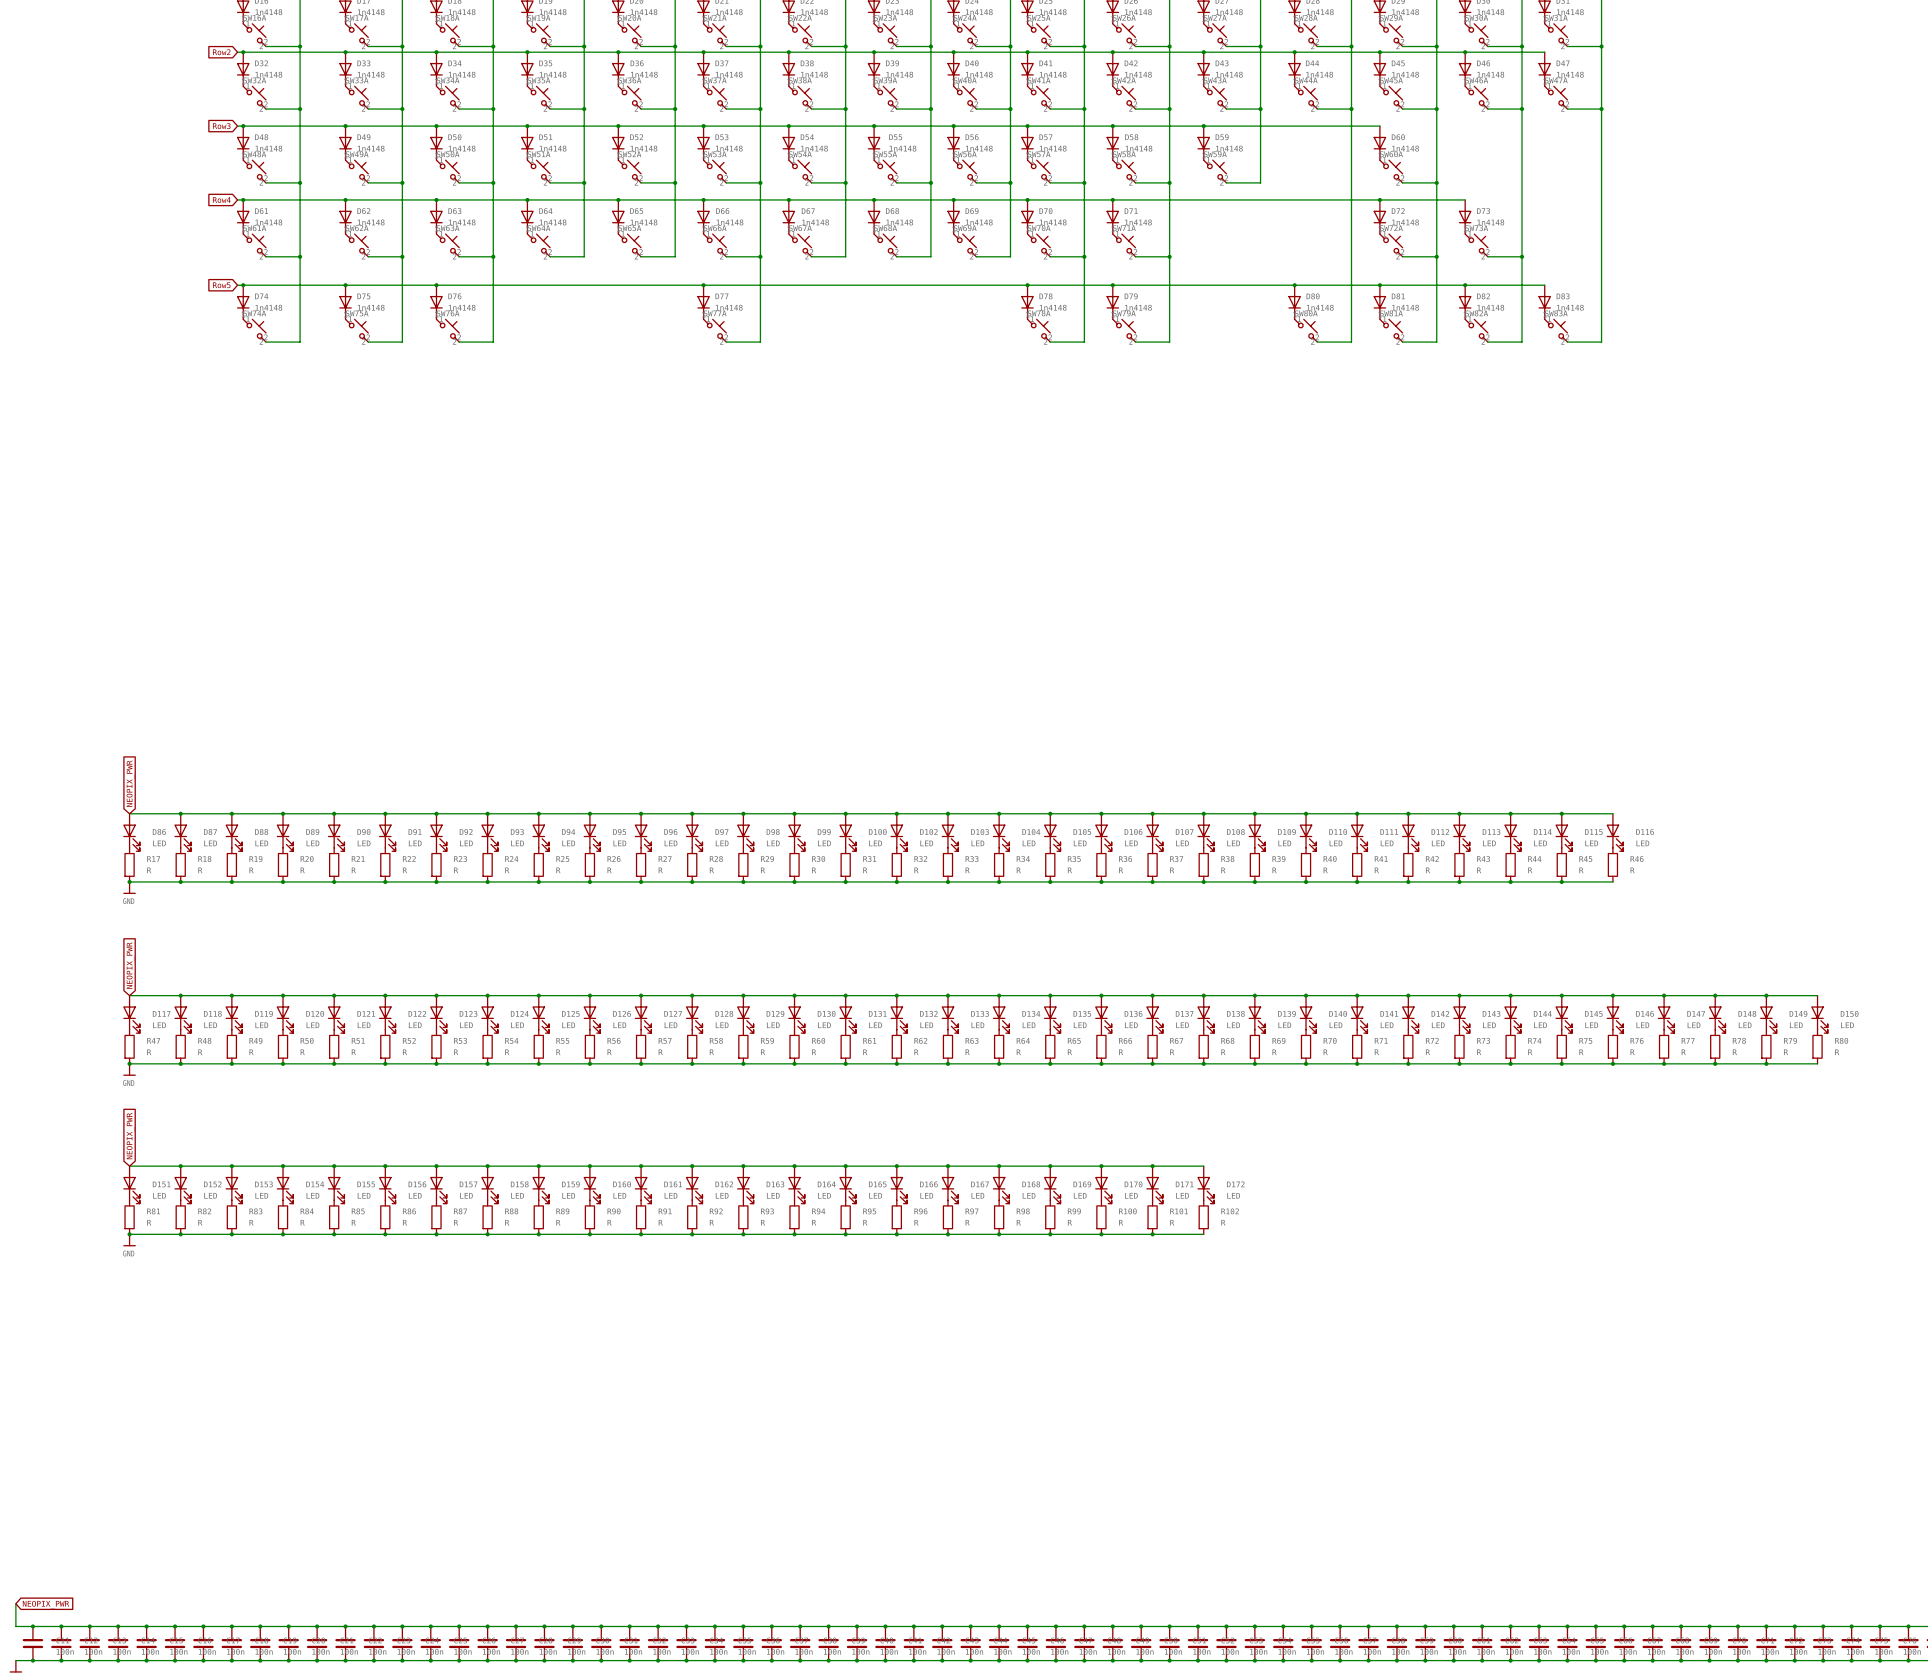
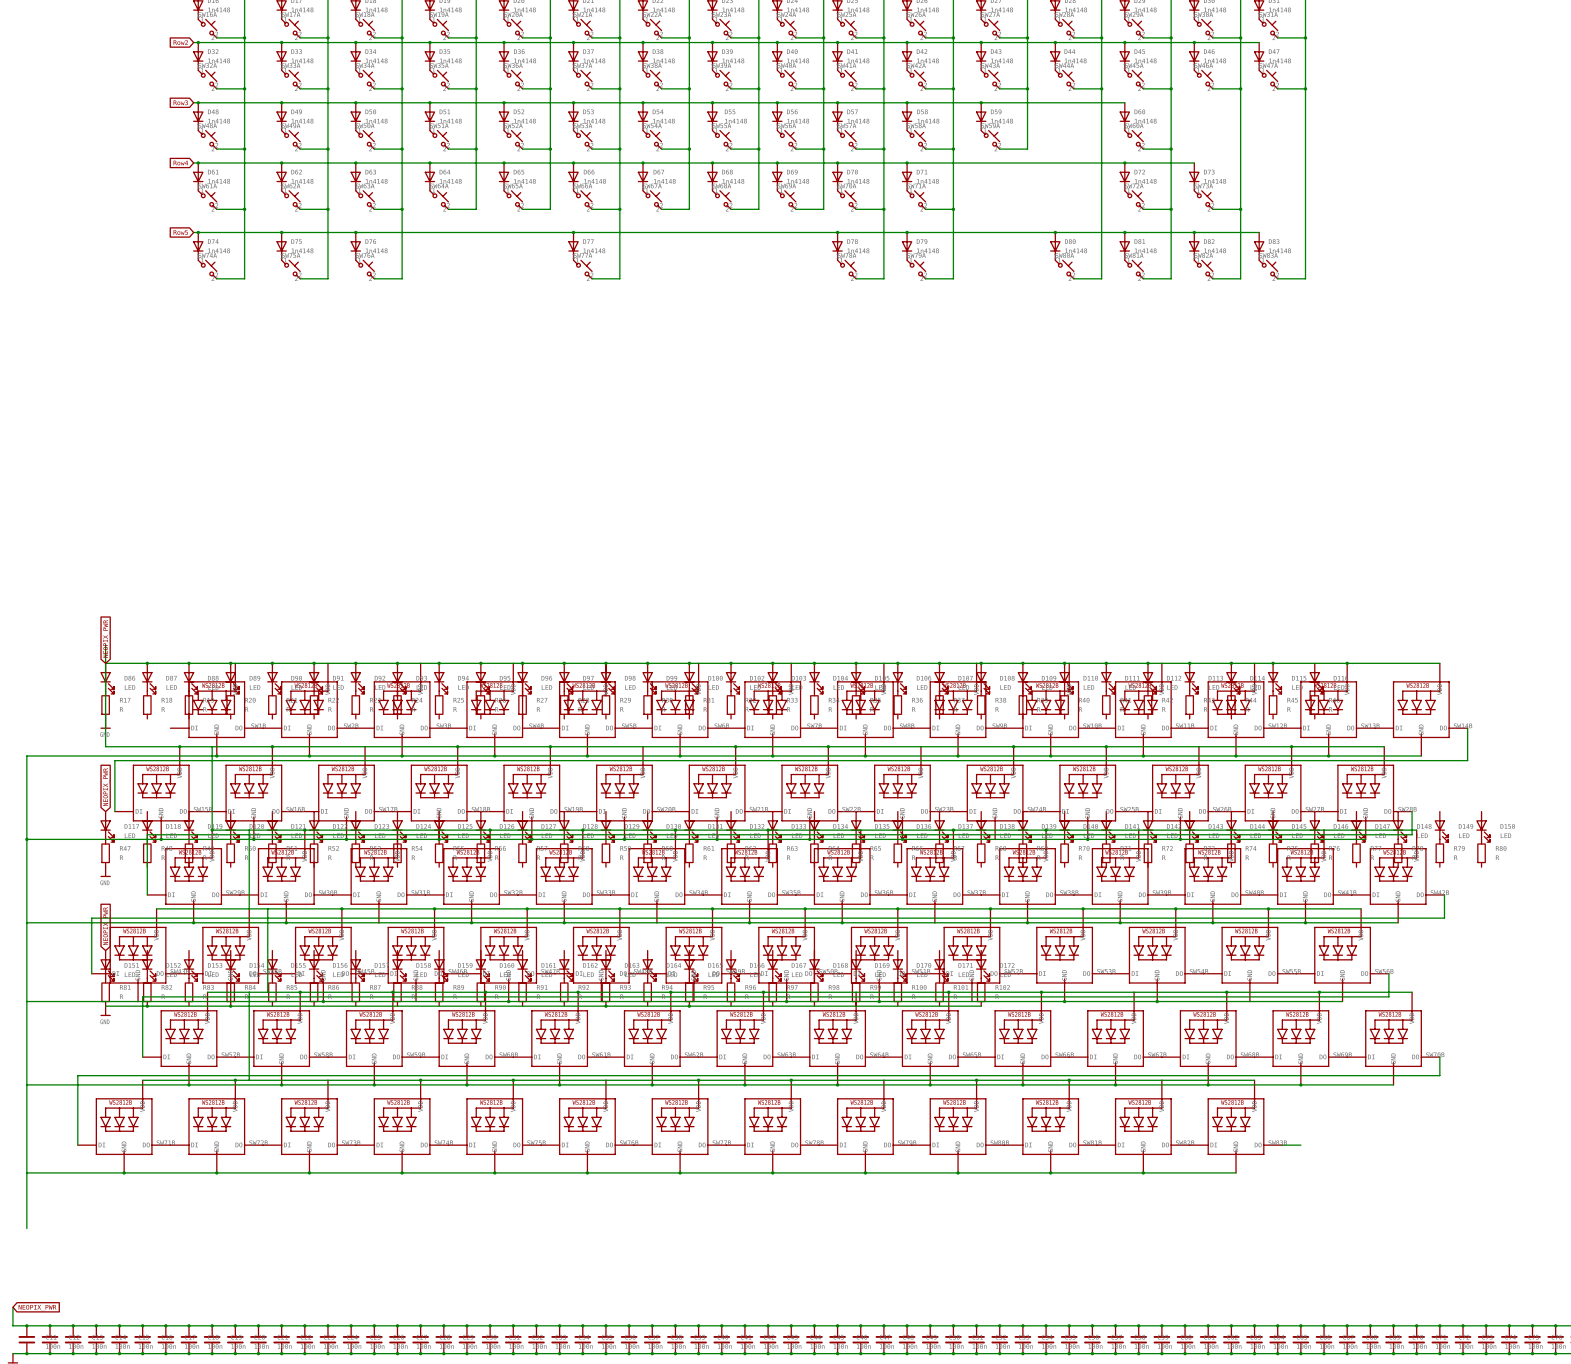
wire: none -> (105, 644) (105, 746) (1384, 746)
wire: none -> (1314, 663) (1439, 663)
junction: none -> (1347, 663)
part: none -> (216, 709)
part: none -> (309, 709)
part: none -> (402, 709)
part: none -> (494, 709)
part: none -> (587, 709)
part: none -> (680, 709)
part: none -> (772, 709)
part: none -> (865, 709)
part: none -> (958, 709)
part: none -> (1050, 709)
part: none -> (1143, 709)
part: none -> (1236, 709)
part: none -> (1328, 709)
part: none -> (1421, 709)
wire: (129, 881) (1612, 881) -> none
junction: (129, 881) -> none
junction: (180, 881) -> none
junction: (231, 881) -> none
junction: (283, 881) -> none
junction: (334, 881) -> none
junction: (385, 881) -> none
junction: (436, 881) -> none
junction: (487, 881) -> none
junction: (538, 881) -> none
junction: (589, 881) -> none
junction: (641, 881) -> none
junction: (692, 881) -> none
junction: (743, 881) -> none
junction: (794, 881) -> none
junction: (845, 881) -> none
junction: (896, 881) -> none
junction: (947, 881) -> none
junction: (999, 881) -> none
junction: (1050, 881) -> none
junction: (1101, 881) -> none
junction: (1152, 881) -> none
junction: (1203, 881) -> none
junction: (1254, 881) -> none
junction: (1306, 881) -> none
junction: (1357, 881) -> none
junction: (1408, 881) -> none
junction: (1459, 881) -> none
junction: (1510, 881) -> none
junction: (1561, 881) -> none
wire: none -> (1467, 728) (1467, 760) (114, 760) (114, 811)
junction: none -> (179, 746)
wire: none -> (212, 746) (212, 830) (1416, 830)
junction: none -> (272, 746)
junction: none -> (457, 746)
junction: none -> (550, 746)
junction: none -> (735, 746)
junction: none -> (828, 746)
junction: none -> (1013, 746)
junction: none -> (1106, 746)
junction: none -> (1291, 746)
junction: none -> (216, 755)
junction: none -> (309, 755)
junction: none -> (402, 755)
junction: none -> (494, 755)
junction: none -> (587, 755)
junction: none -> (680, 755)
junction: none -> (772, 755)
junction: none -> (865, 755)
junction: none -> (958, 755)
junction: none -> (1050, 755)
junction: none -> (1143, 755)
junction: none -> (1236, 755)
junction: none -> (1328, 755)
wire: none -> (1421, 755) (26, 755) (26, 1228)
part: none -> (161, 793)
part: none -> (253, 793)
part: none -> (346, 793)
part: none -> (439, 793)
part: none -> (531, 793)
part: none -> (624, 793)
part: none -> (717, 793)
part: none -> (809, 793)
part: none -> (902, 793)
part: none -> (995, 793)
part: none -> (1087, 793)
part: none -> (1180, 793)
part: none -> (1273, 793)
part: none -> (1365, 793)
wire: (129, 995) (1817, 995) -> none
junction: (180, 995) -> none
junction: (231, 995) -> none
junction: (283, 995) -> none
junction: (334, 995) -> none
junction: (385, 995) -> none
junction: (436, 995) -> none
junction: (487, 995) -> none
junction: (538, 995) -> none
junction: (589, 995) -> none
junction: (641, 995) -> none
junction: (692, 995) -> none
junction: (743, 995) -> none
junction: (794, 995) -> none
junction: (845, 995) -> none
junction: (896, 995) -> none
junction: (947, 995) -> none
junction: (999, 995) -> none
junction: (1050, 995) -> none
junction: (1101, 995) -> none
junction: (1152, 995) -> none
junction: (1203, 995) -> none
junction: (1254, 995) -> none
junction: (1306, 995) -> none
junction: (1357, 995) -> none
junction: (1408, 995) -> none
junction: (1459, 995) -> none
junction: (1510, 995) -> none
junction: (1561, 995) -> none
junction: (1612, 995) -> none
junction: (1664, 995) -> none
junction: (1715, 995) -> none
wire: none -> (1412, 811) (1412, 834) (147, 834) (147, 894)
junction: (1766, 995) -> none
junction: none -> (212, 830)
wire: none -> (249, 830) (249, 908)
junction: none -> (304, 830)
junction: none -> (490, 830)
junction: none -> (582, 830)
junction: none -> (675, 830)
junction: none -> (768, 830)
junction: none -> (953, 830)
junction: none -> (1046, 830)
wire: none -> (26, 839) (1365, 839)
junction: none -> (26, 839)
junction: none -> (161, 839)
junction: none -> (253, 839)
junction: none -> (346, 839)
junction: none -> (439, 839)
junction: none -> (531, 839)
junction: none -> (624, 839)
junction: none -> (717, 839)
junction: none -> (809, 839)
junction: none -> (902, 839)
junction: none -> (1087, 839)
junction: none -> (1180, 839)
wire: (129, 1063) (1817, 1063) -> none
junction: (129, 1063) -> none
junction: (180, 1063) -> none
junction: (231, 1063) -> none
junction: (283, 1063) -> none
junction: (334, 1063) -> none
junction: (385, 1063) -> none
junction: (436, 1063) -> none
junction: (487, 1063) -> none
junction: (538, 1063) -> none
junction: (589, 1063) -> none
junction: (641, 1063) -> none
junction: (692, 1063) -> none
junction: (743, 1063) -> none
junction: (794, 1063) -> none
junction: (845, 1063) -> none
junction: (896, 1063) -> none
junction: (947, 1063) -> none
junction: (999, 1063) -> none
junction: (1050, 1063) -> none
junction: (1101, 1063) -> none
junction: (1152, 1063) -> none
junction: (1203, 1063) -> none
junction: (1254, 1063) -> none
junction: (1306, 1063) -> none
junction: (1357, 1063) -> none
junction: (1408, 1063) -> none
junction: (1459, 1063) -> none
junction: (1510, 1063) -> none
junction: (1561, 1063) -> none
junction: (1612, 1063) -> none
junction: (1664, 1063) -> none
junction: (1715, 1063) -> none
junction: (1766, 1063) -> none
part: none -> (193, 876)
part: none -> (286, 876)
part: none -> (378, 876)
part: none -> (471, 876)
part: none -> (564, 876)
part: none -> (656, 876)
part: none -> (749, 876)
part: none -> (842, 876)
part: none -> (934, 876)
part: none -> (1027, 876)
part: none -> (1120, 876)
part: none -> (1212, 876)
part: none -> (1305, 876)
part: none -> (1398, 876)
wire: none -> (1444, 894) (1444, 918) (91, 918) (91, 973)
wire: none -> (156, 908) (1361, 908)
wire: none -> (267, 908) (267, 992)
junction: none -> (341, 908)
junction: none -> (434, 908)
junction: none -> (527, 908)
junction: none -> (619, 908)
junction: none -> (712, 908)
junction: none -> (805, 908)
junction: none -> (897, 908)
junction: none -> (990, 908)
junction: none -> (1083, 908)
junction: none -> (1175, 908)
junction: none -> (1268, 908)
wire: none -> (26, 922) (1398, 922)
junction: none -> (193, 922)
junction: none -> (286, 922)
junction: none -> (471, 922)
junction: none -> (564, 922)
junction: none -> (749, 922)
junction: none -> (842, 922)
junction: none -> (1027, 922)
junction: none -> (1120, 922)
junction: none -> (1212, 922)
junction: none -> (1305, 922)
wire: (129, 1166) (1203, 1166) -> none
junction: (180, 1166) -> none
junction: (231, 1166) -> none
junction: (283, 1166) -> none
junction: (334, 1166) -> none
junction: (385, 1166) -> none
junction: (436, 1166) -> none
junction: (487, 1166) -> none
junction: (538, 1166) -> none
junction: (589, 1166) -> none
junction: (641, 1166) -> none
junction: (692, 1166) -> none
junction: (743, 1166) -> none
junction: (794, 1166) -> none
junction: (845, 1166) -> none
junction: (896, 1166) -> none
junction: (947, 1166) -> none
junction: (999, 1166) -> none
junction: (1050, 1166) -> none
junction: (1101, 1166) -> none
junction: (1152, 1166) -> none
part: none -> (138, 955)
part: none -> (230, 955)
part: none -> (323, 955)
part: none -> (416, 955)
part: none -> (508, 955)
part: none -> (601, 955)
part: none -> (693, 955)
part: none -> (786, 955)
part: none -> (879, 955)
part: none -> (971, 955)
part: none -> (1064, 955)
part: none -> (1157, 955)
part: none -> (1249, 955)
part: none -> (1342, 955)
wire: none -> (1388, 973) (1388, 996) (142, 996) (142, 1057)
wire: none -> (207, 992) (1412, 992)
wire: none -> (249, 992) (249, 1080)
junction: none -> (300, 992)
junction: none -> (485, 992)
junction: none -> (670, 992)
junction: none -> (763, 992)
junction: none -> (1041, 992)
junction: none -> (1226, 992)
junction: none -> (1319, 992)
wire: none -> (26, 1001) (1342, 1001)
junction: none -> (323, 1001)
junction: none -> (508, 1001)
junction: none -> (786, 1001)
junction: none -> (879, 1001)
junction: none -> (1064, 1001)
junction: none -> (1157, 1001)
junction: (129, 1234) -> none
junction: (231, 1234) -> none
junction: (334, 1234) -> none
junction: (385, 1234) -> none
junction: (436, 1234) -> none
junction position: (487, 1234) -> (392, 992)
junction: (538, 1234) -> none
junction: (589, 1234) -> none
junction: (641, 1234) -> none
junction position: (692, 1234) -> (578, 992)
junction: (794, 1234) -> none
junction: (896, 1234) -> none
junction: (947, 1234) -> none
junction: (999, 1234) -> none
junction: (1050, 1234) -> none
junction: (1101, 1234) -> none
junction position: (1152, 1234) -> (948, 992)
part: none -> (189, 1038)
part: none -> (281, 1038)
part: none -> (374, 1038)
part: none -> (466, 1038)
part: none -> (559, 1038)
part: none -> (652, 1038)
part: none -> (744, 1038)
part: none -> (837, 1038)
part: none -> (930, 1038)
part: none -> (1022, 1038)
part: none -> (1115, 1038)
part: none -> (1208, 1038)
part: none -> (1300, 1038)
part: none -> (1393, 1038)
wire: none -> (1439, 1057) (1439, 1075) (77, 1075) (77, 1145)
wire: none -> (142, 1080) (1254, 1080)
junction: none -> (235, 1080)
junction: none -> (420, 1080)
junction: none -> (513, 1080)
junction: none -> (698, 1080)
junction: none -> (791, 1080)
junction: none -> (976, 1080)
junction: none -> (1069, 1080)
wire: none -> (26, 1084) (1393, 1084)
junction: none -> (189, 1084)
junction: none -> (281, 1084)
junction: none -> (374, 1084)
junction: none -> (466, 1084)
junction: none -> (559, 1084)
junction: none -> (652, 1084)
junction: none -> (744, 1084)
junction: none -> (837, 1084)
junction: none -> (930, 1084)
junction: none -> (1022, 1084)
junction: none -> (1115, 1084)
junction: none -> (1208, 1084)
junction: none -> (1300, 1084)
part: none -> (124, 1126)
part: none -> (216, 1126)
part: none -> (309, 1126)
part: none -> (402, 1126)
part: none -> (494, 1126)
part: none -> (587, 1126)
part: none -> (680, 1126)
part: none -> (772, 1126)
part: none -> (865, 1126)
part: none -> (958, 1126)
part: none -> (1050, 1126)
part: none -> (1143, 1126)
part: none -> (1236, 1126)
wire: none -> (1282, 1145) (1300, 1145)
wire: none -> (26, 1172) (1236, 1172)
junction: none -> (124, 1172)
junction: none -> (216, 1172)
junction: none -> (309, 1172)
junction: none -> (402, 1172)
junction: none -> (494, 1172)
junction: none -> (587, 1172)
junction: none -> (680, 1172)
junction: none -> (772, 1172)
junction: none -> (865, 1172)
junction: none -> (958, 1172)
junction: none -> (1050, 1172)
junction: none -> (1143, 1172)

